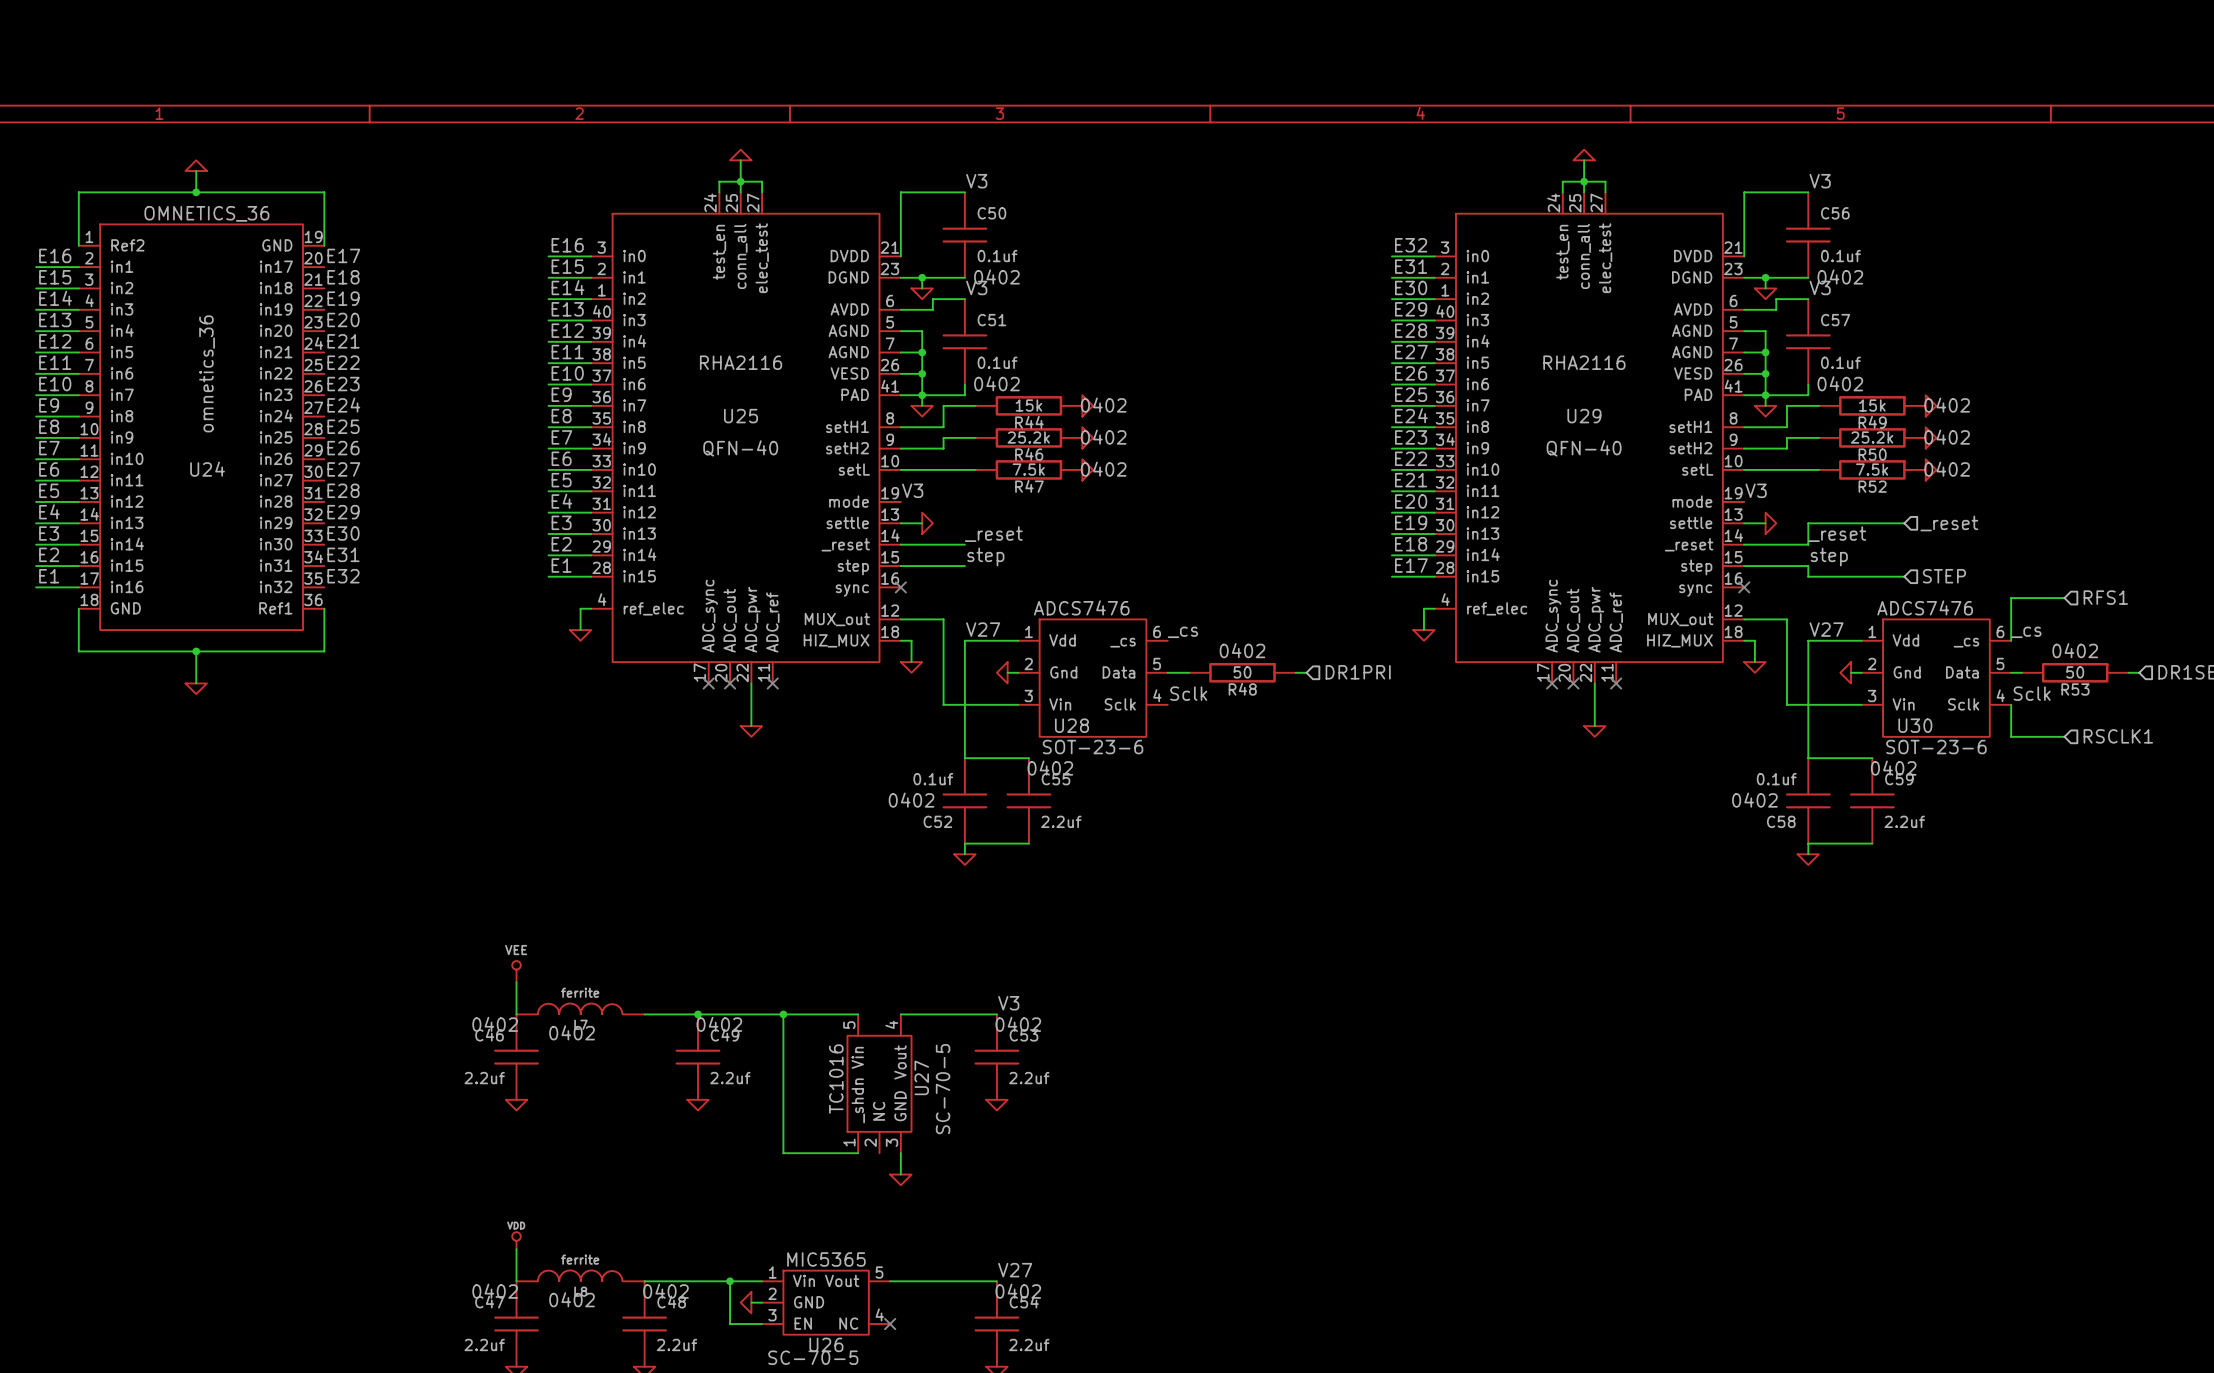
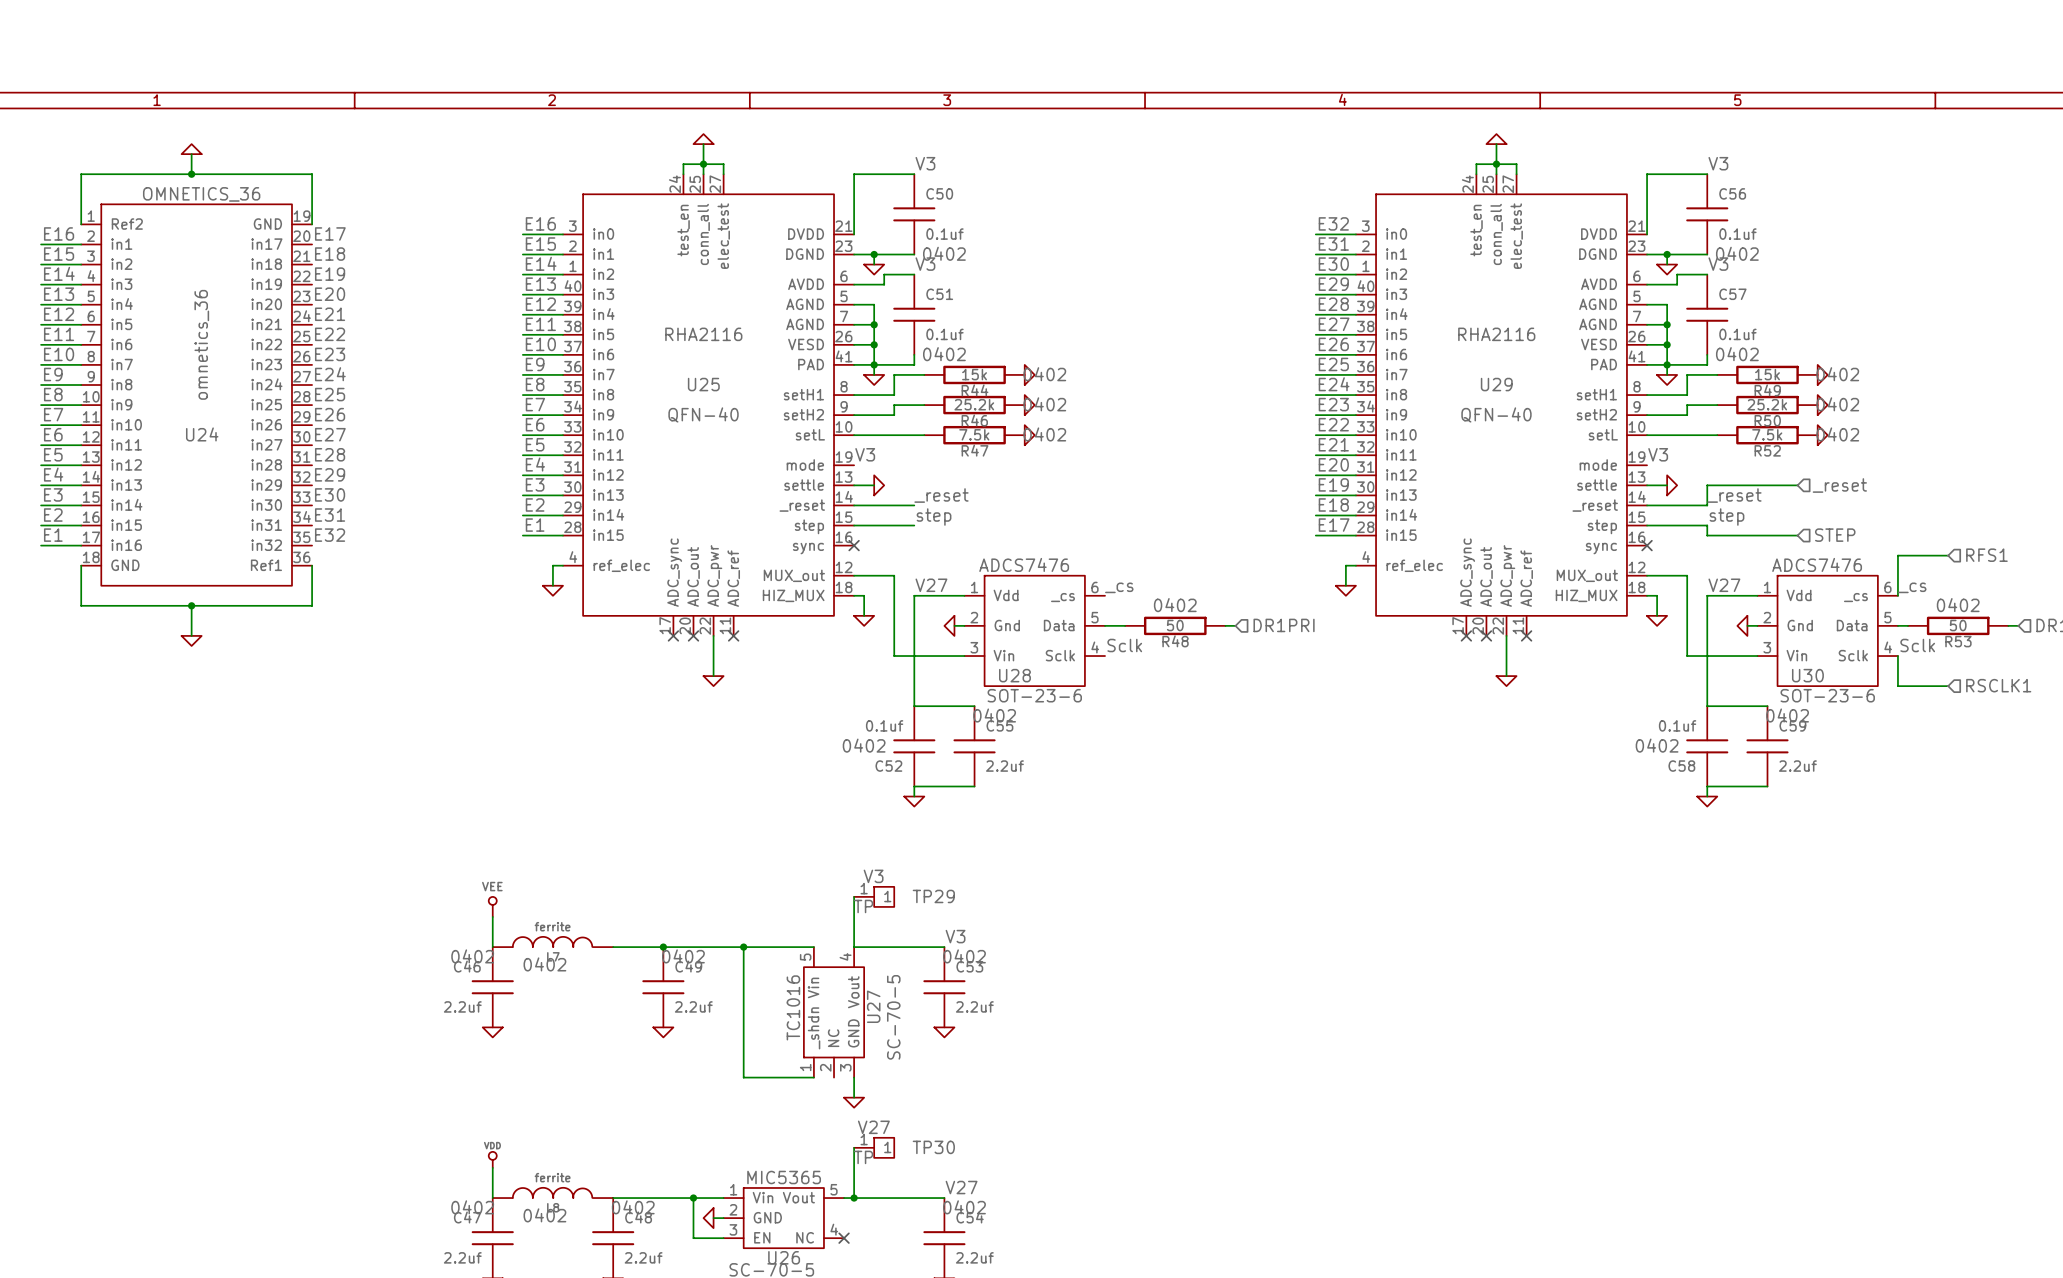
wire: none -> (854, 896) (854, 947)
TP29: none -> V3 (874, 896)
wire: none -> (854, 1147) (854, 1198)
TP30: none -> V27 (874, 1147)
junction: none -> (854, 1198)

